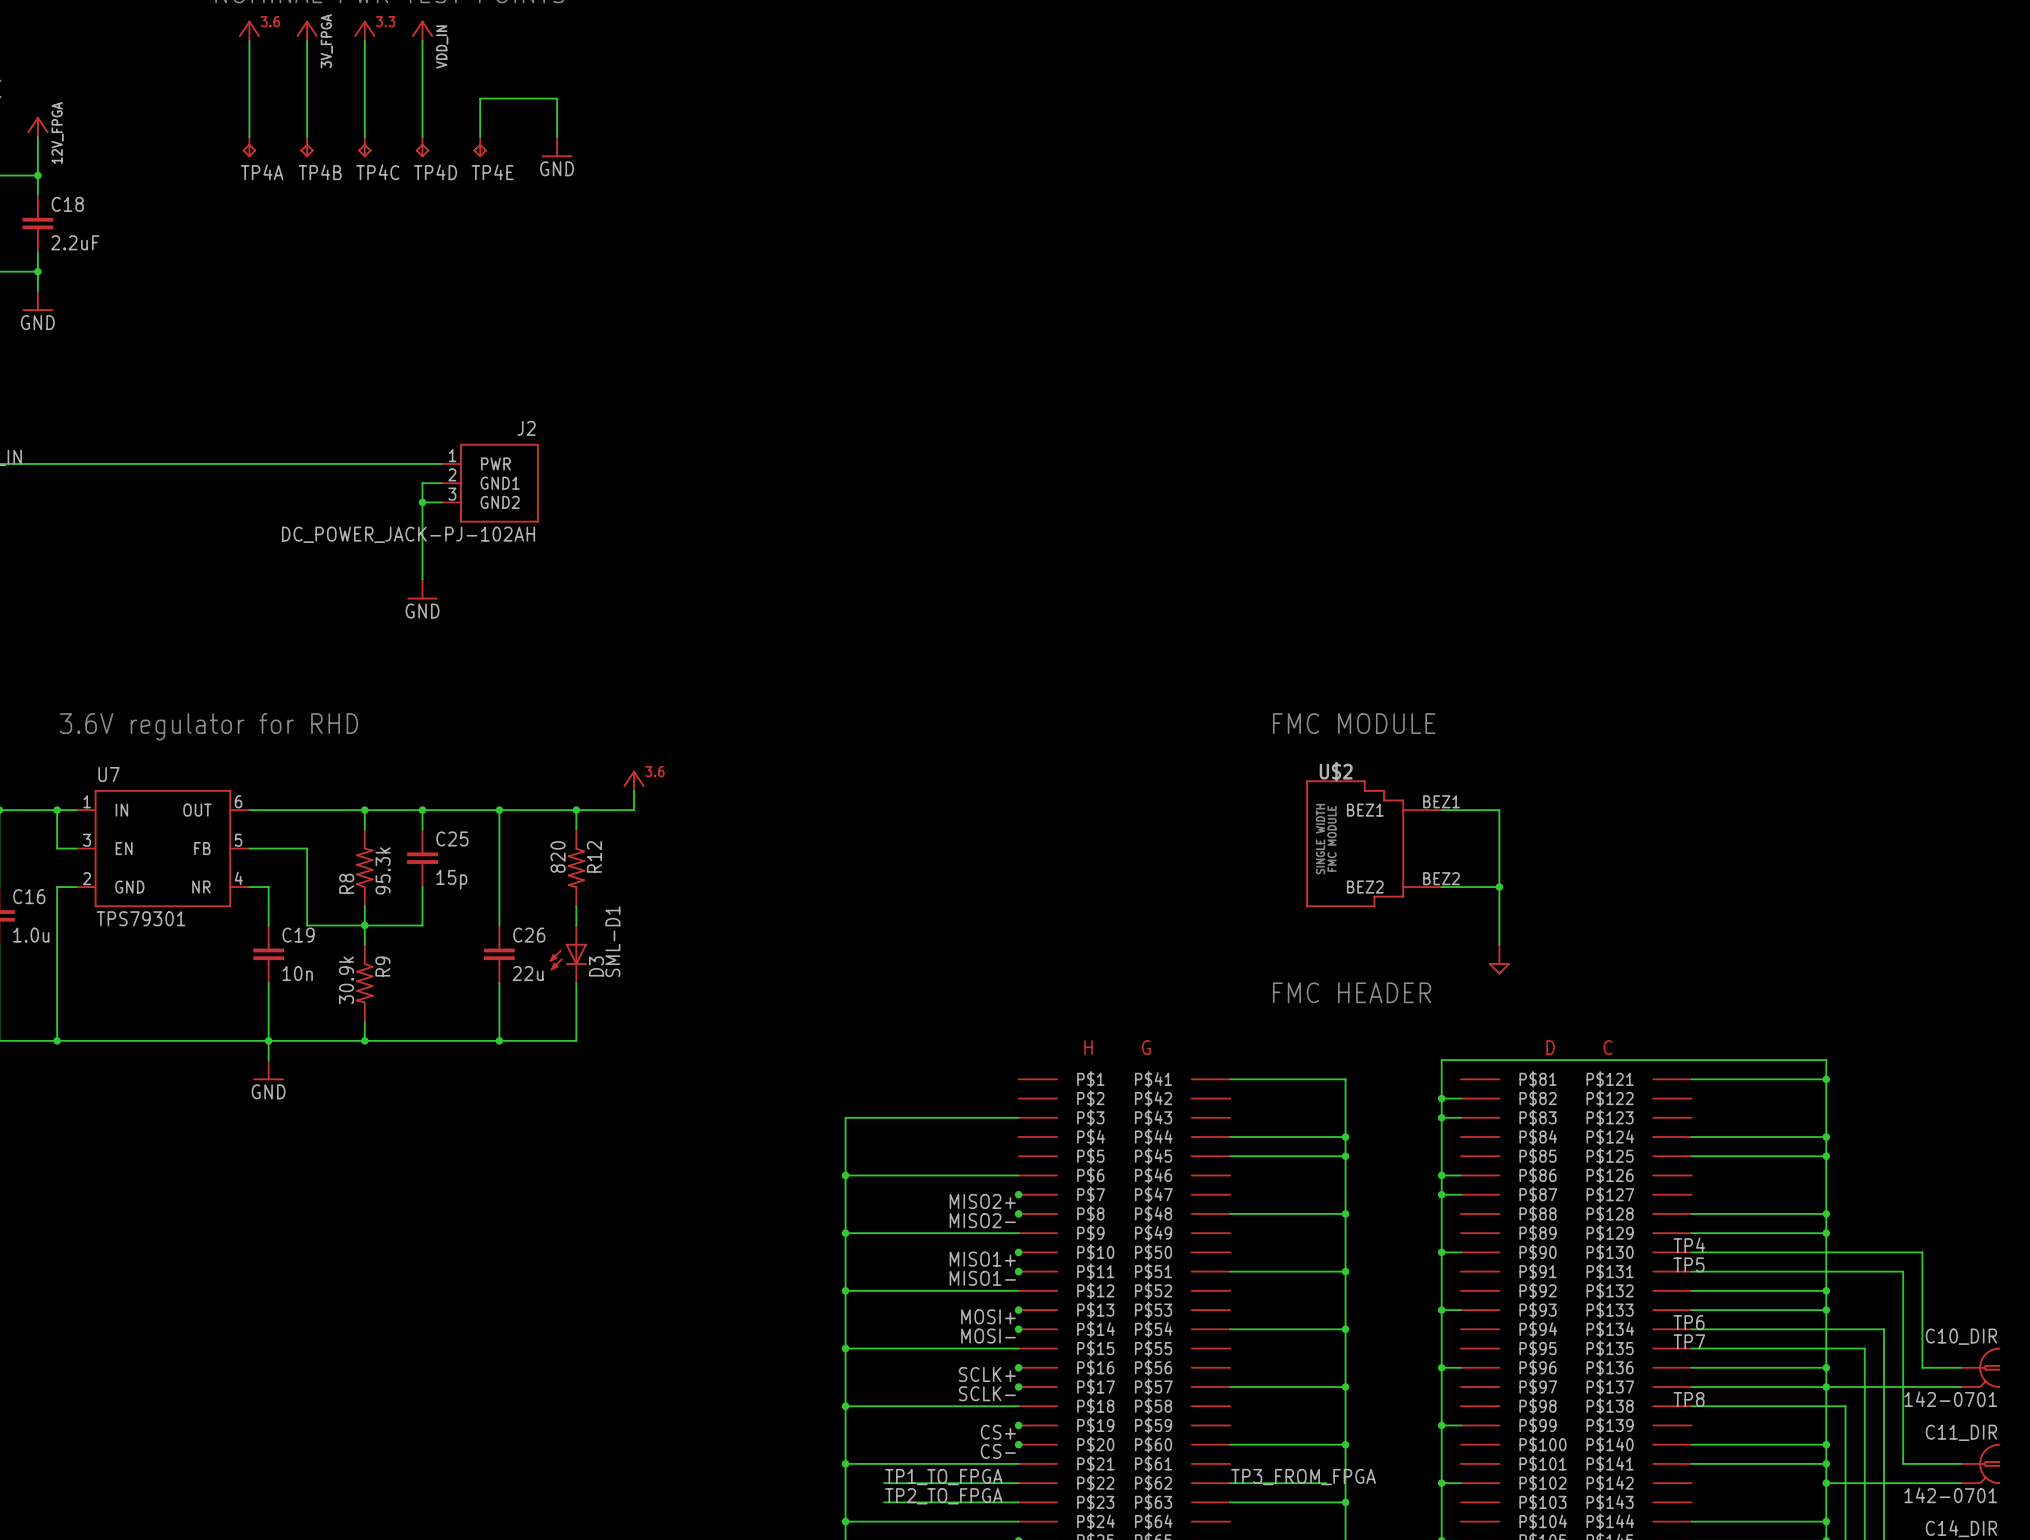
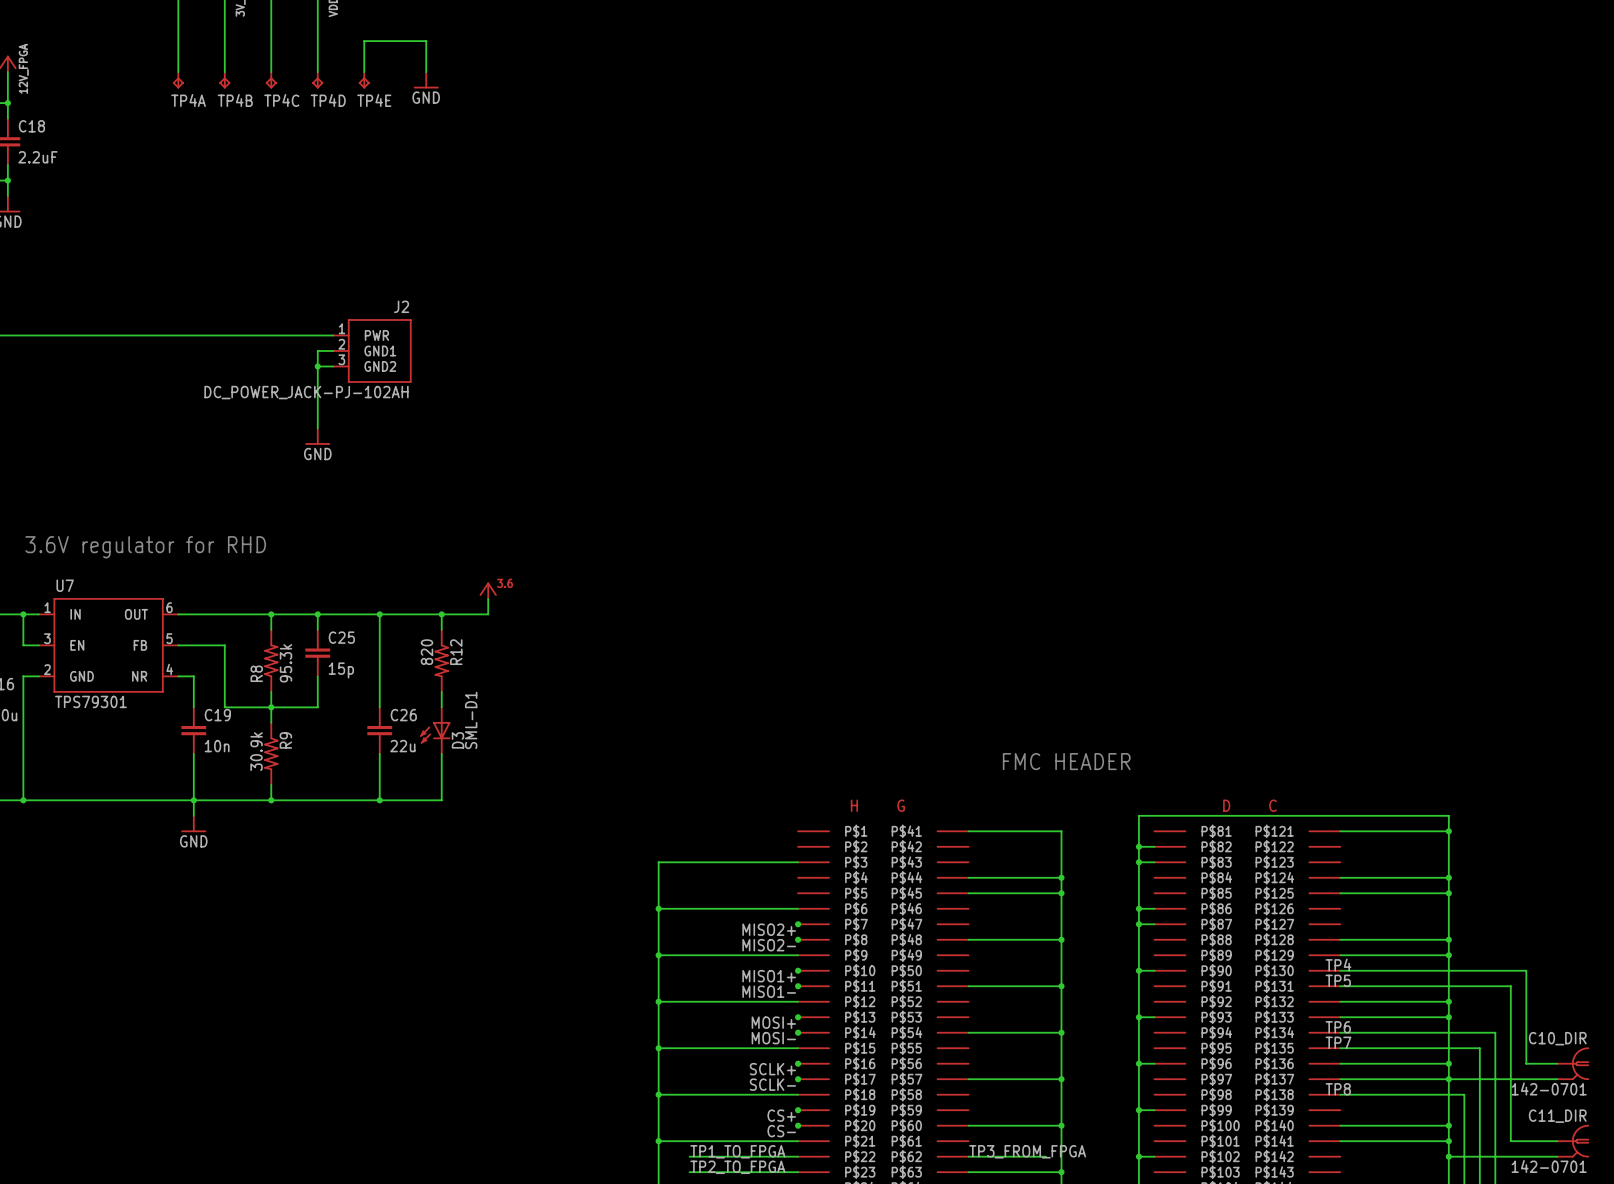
text: FMC MODULE (1354, 723) -> none
wire: (1441, 810) (1499, 810) (1499, 944) -> none
U$2: (1373, 843) -> none
wire: (1441, 887) (1499, 887) -> none
junction: (1499, 887) -> none
power symbol: (1499, 959) -> none

